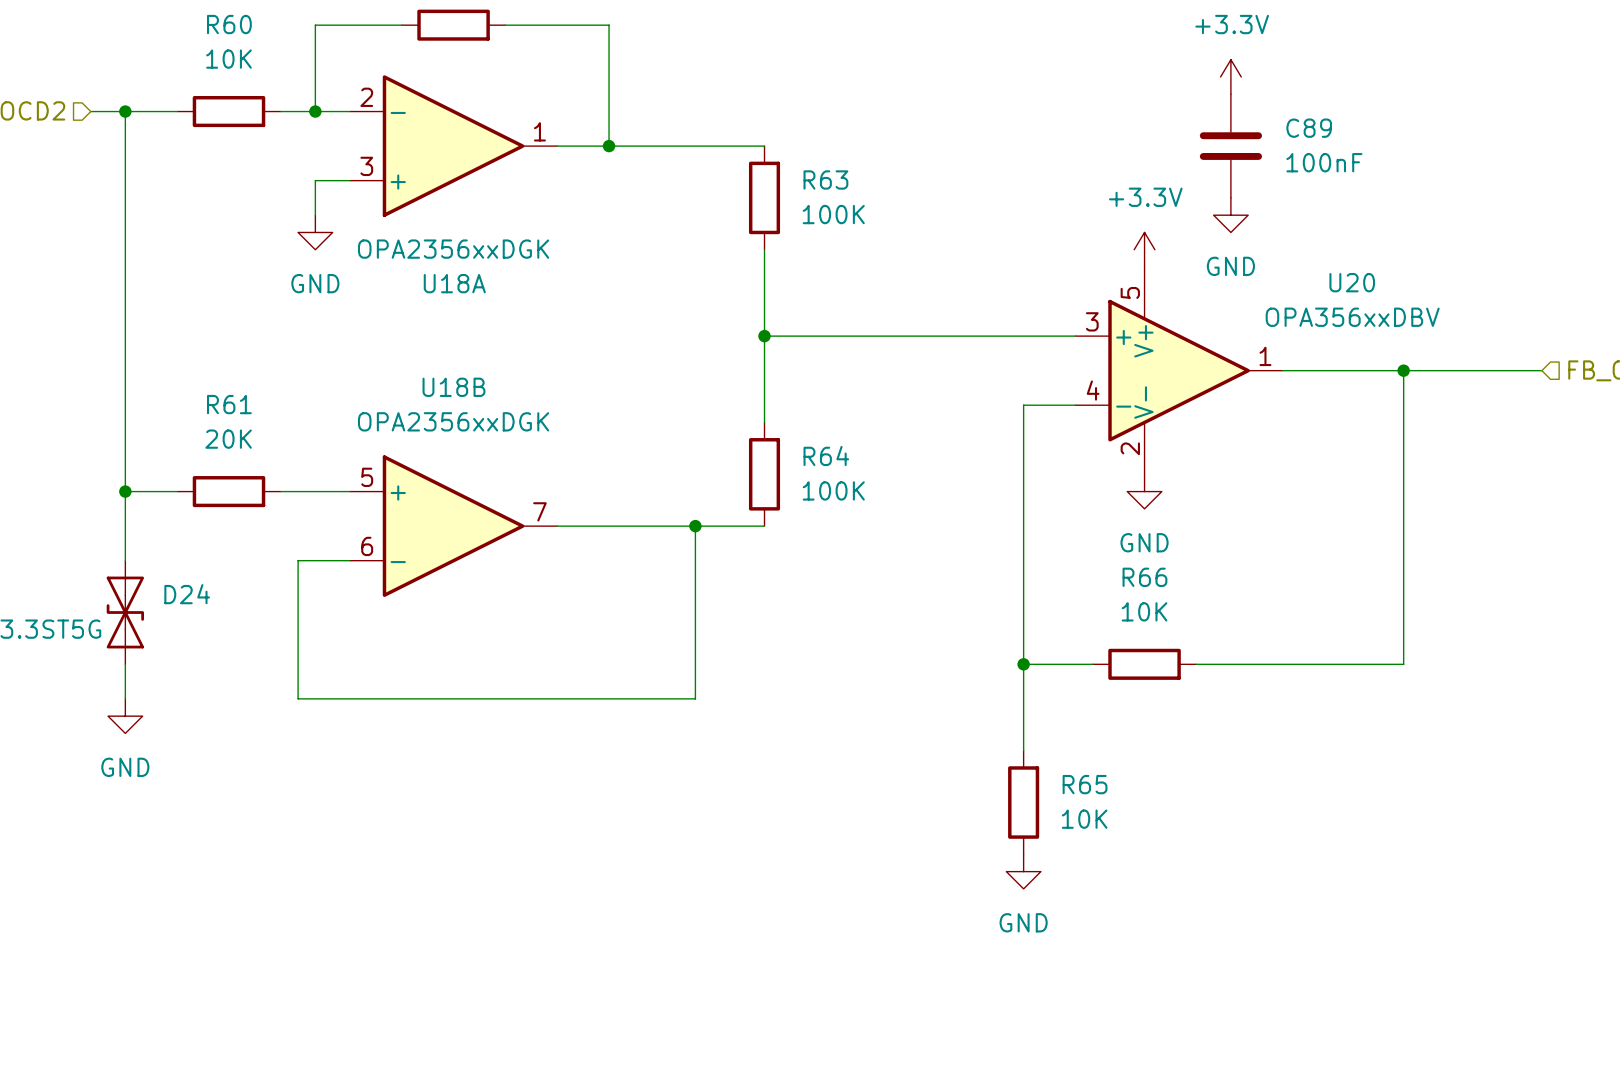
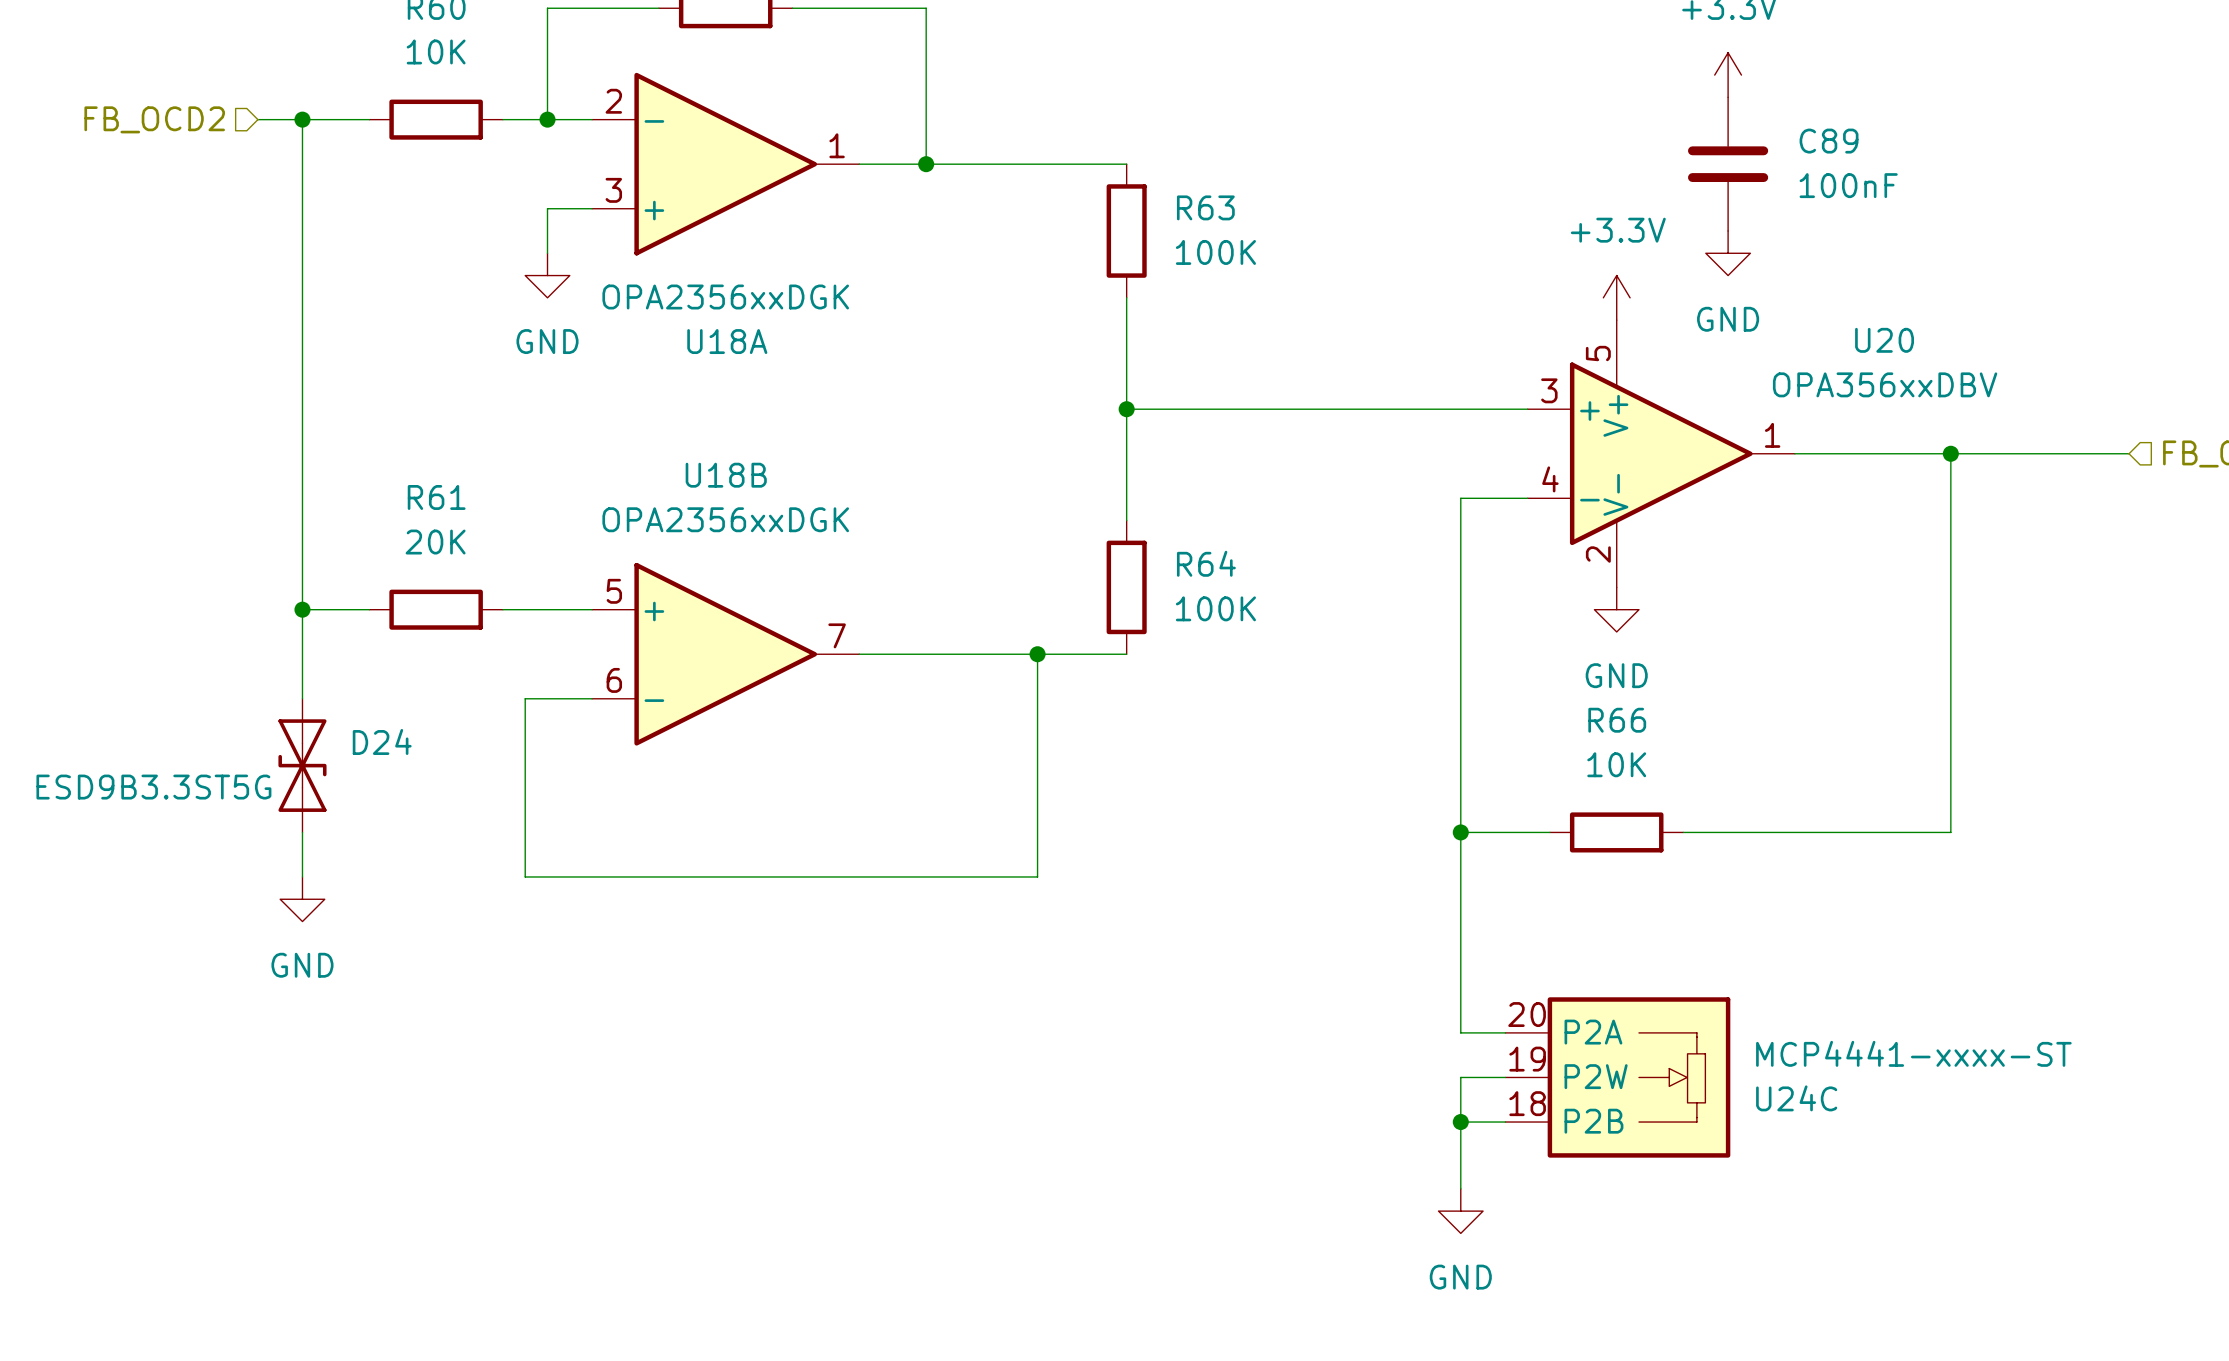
wire: none -> (1460, 943) (1460, 1032) (1505, 1032)
R65: 10K (1023, 802) -> none
wire: none -> (1505, 1077) (1460, 1077) (1460, 1188)
U24C: none -> MCP4441-xxxx-ST (1617, 1077)
power symbol position: GND (1023, 871) -> GND (1460, 1211)
wire: none -> (1460, 1122) (1505, 1122)
junction: none -> (1460, 1122)

